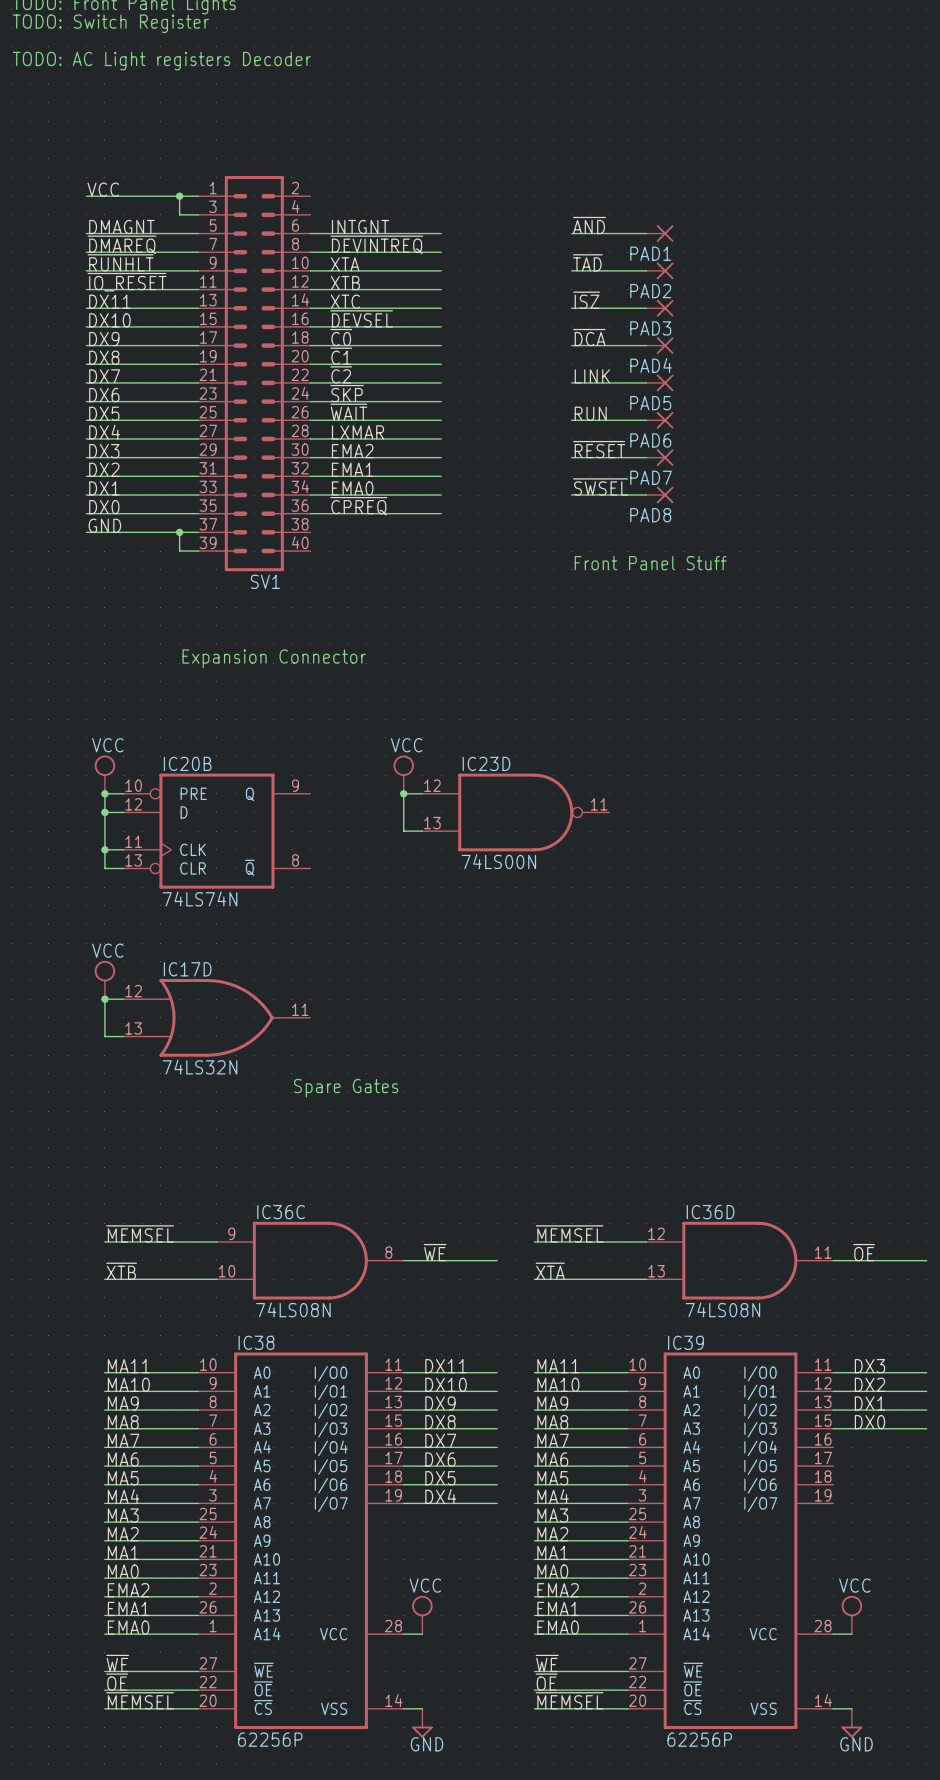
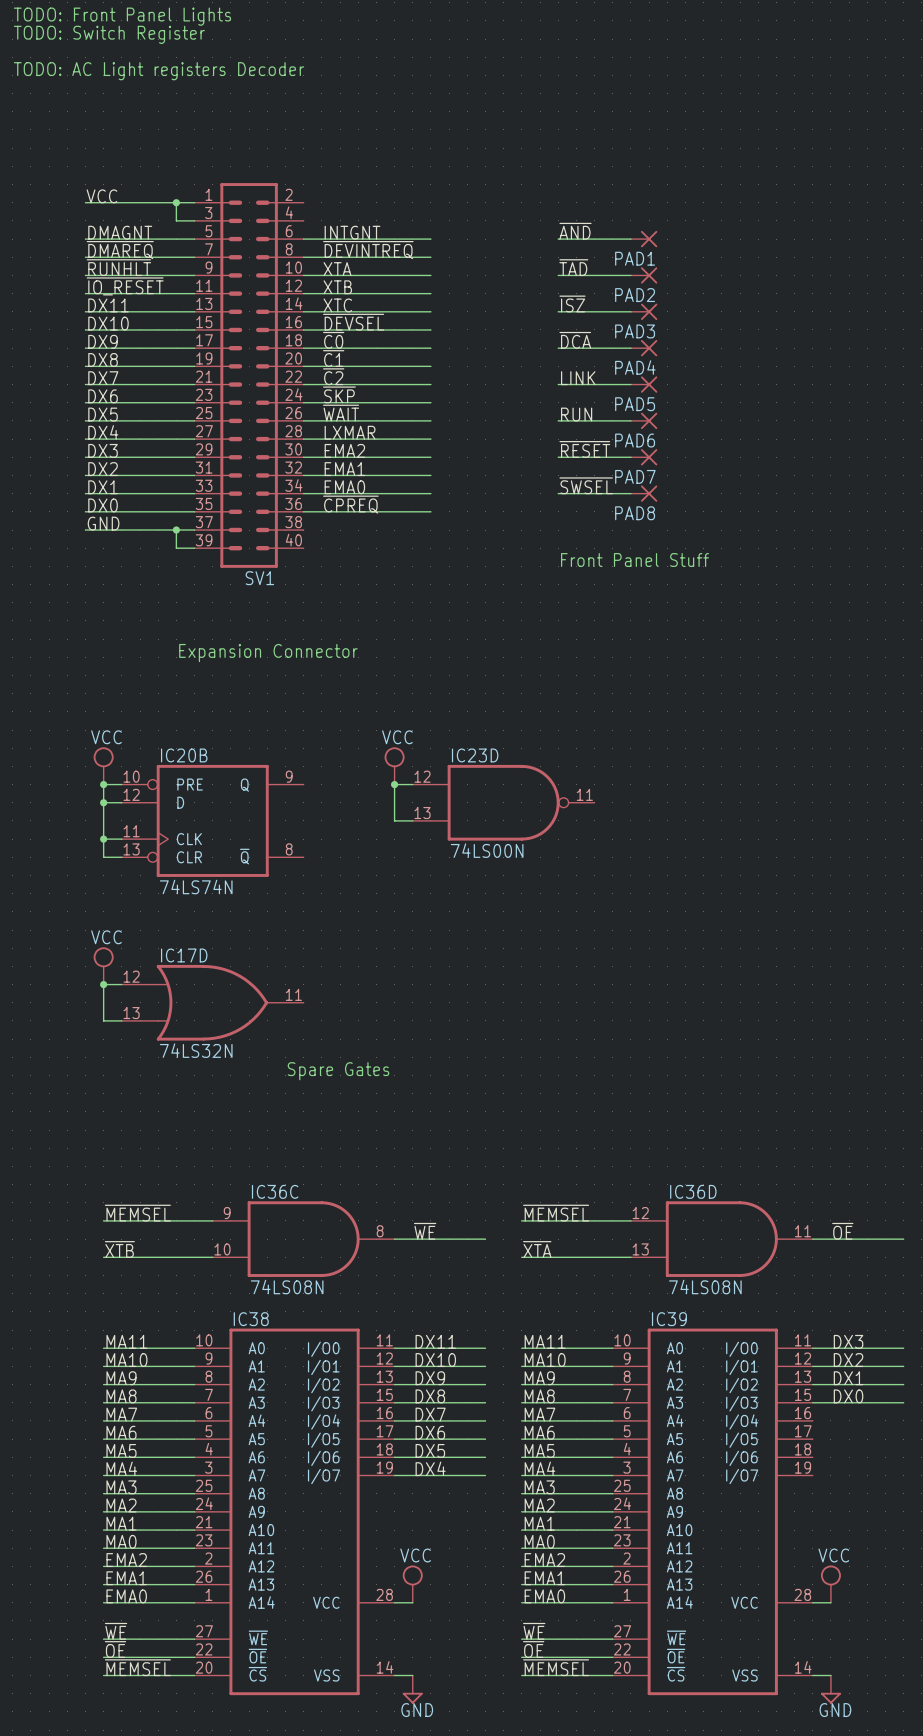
IC38 value: 62256P (270, 1739) -> none
IC39 value: 62256P (699, 1739) -> none

